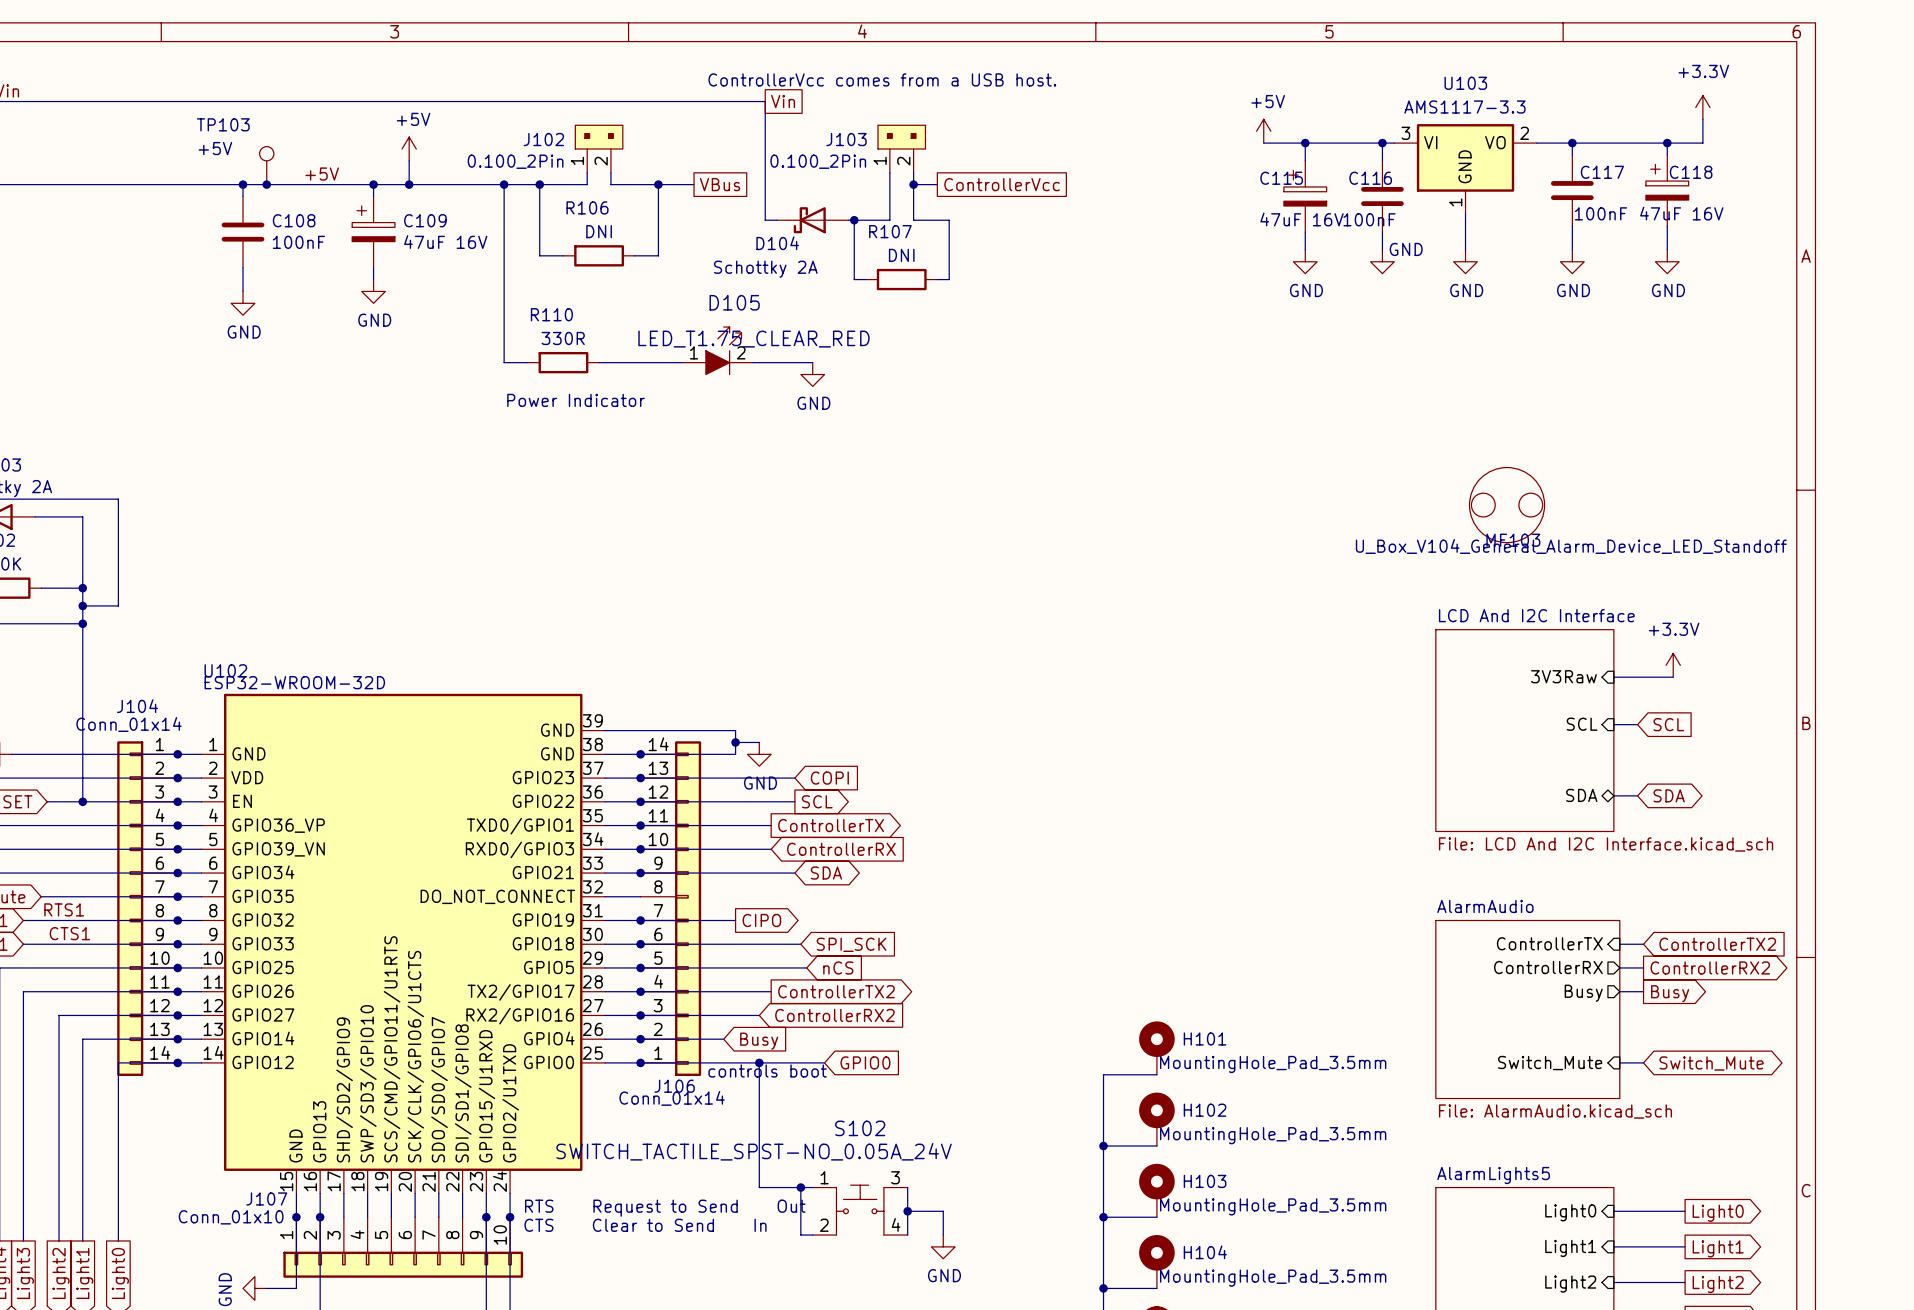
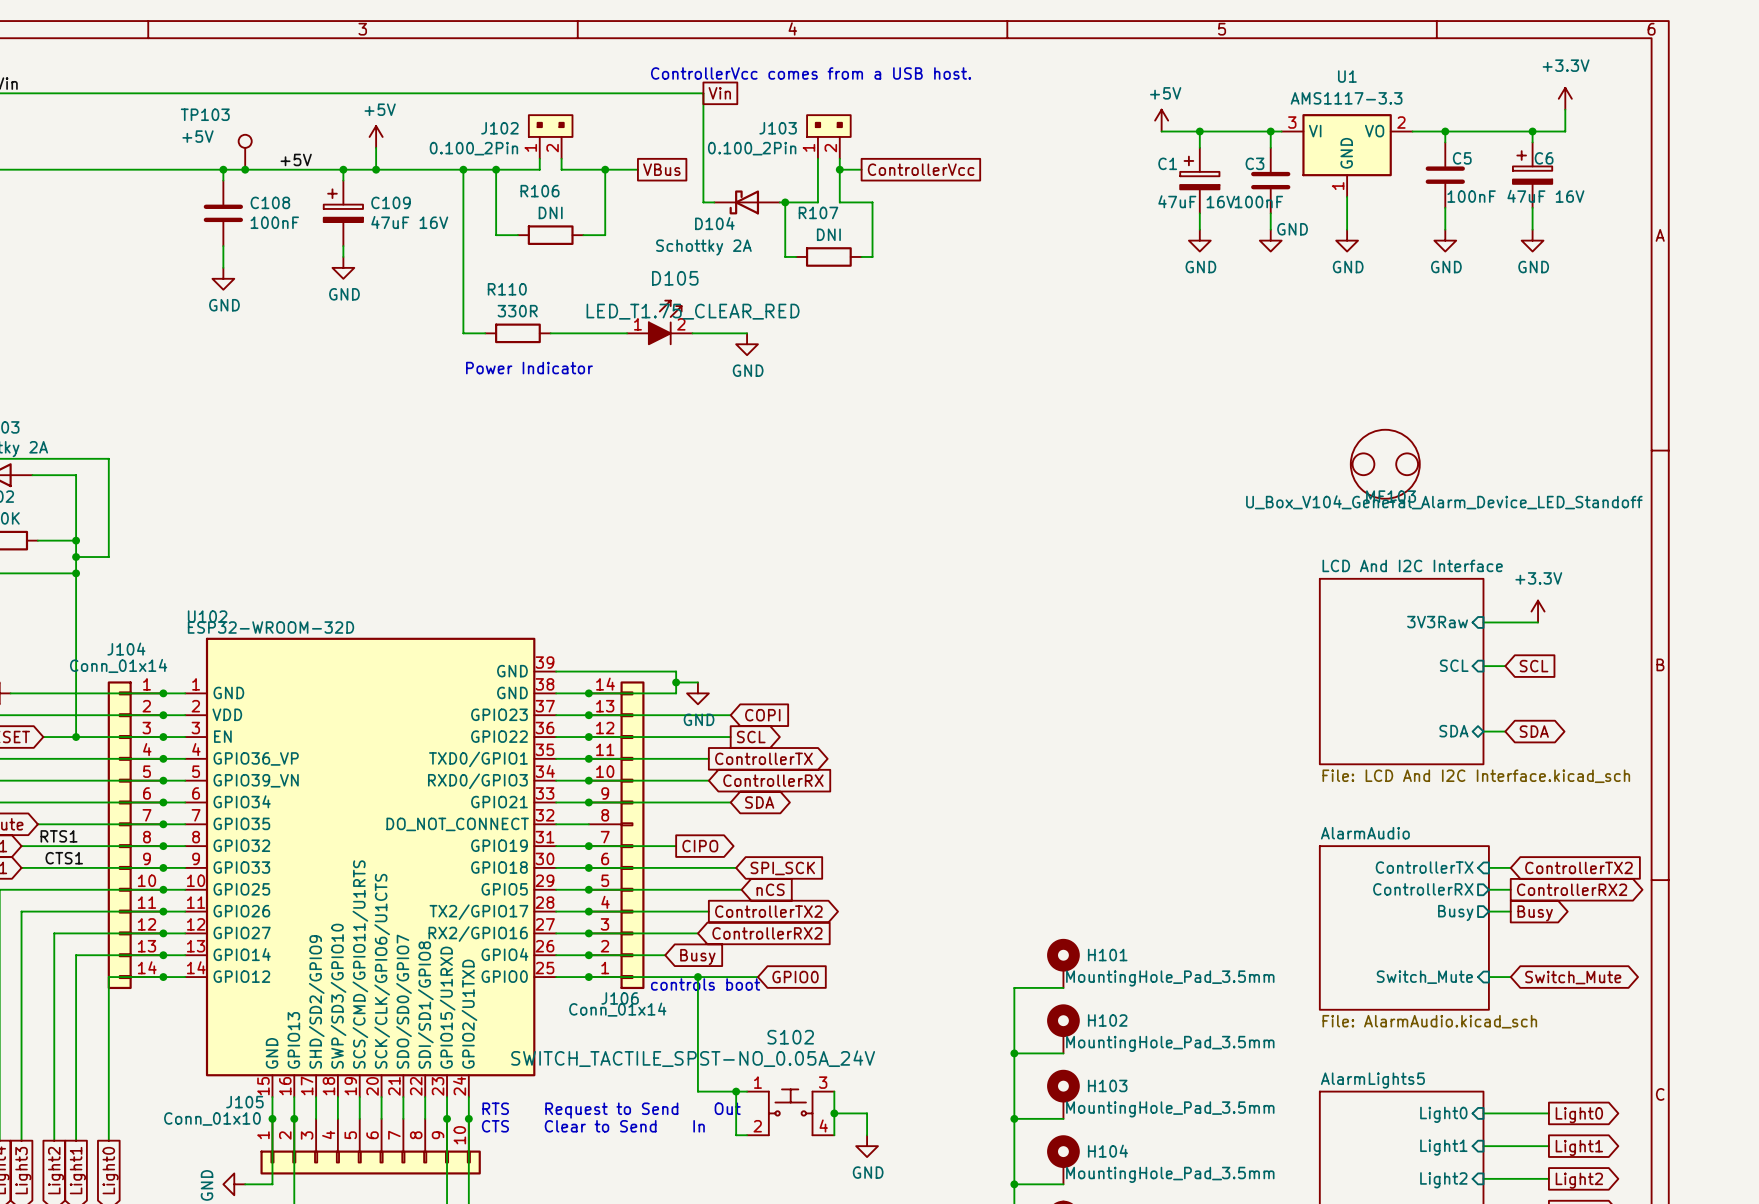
U103 name: U103 (1465, 83) -> U1 (1347, 76)
C117 name: C117 (1602, 172) -> C5 (1462, 158)
C118 name: C118 (1691, 172) -> C6 (1544, 158)
C115 name: C115 (1281, 178) -> C1 (1167, 163)
C116 name: C116 (1370, 178) -> C3 (1254, 163)
J107 name: J107 (266, 1198) -> J105 (244, 1102)

